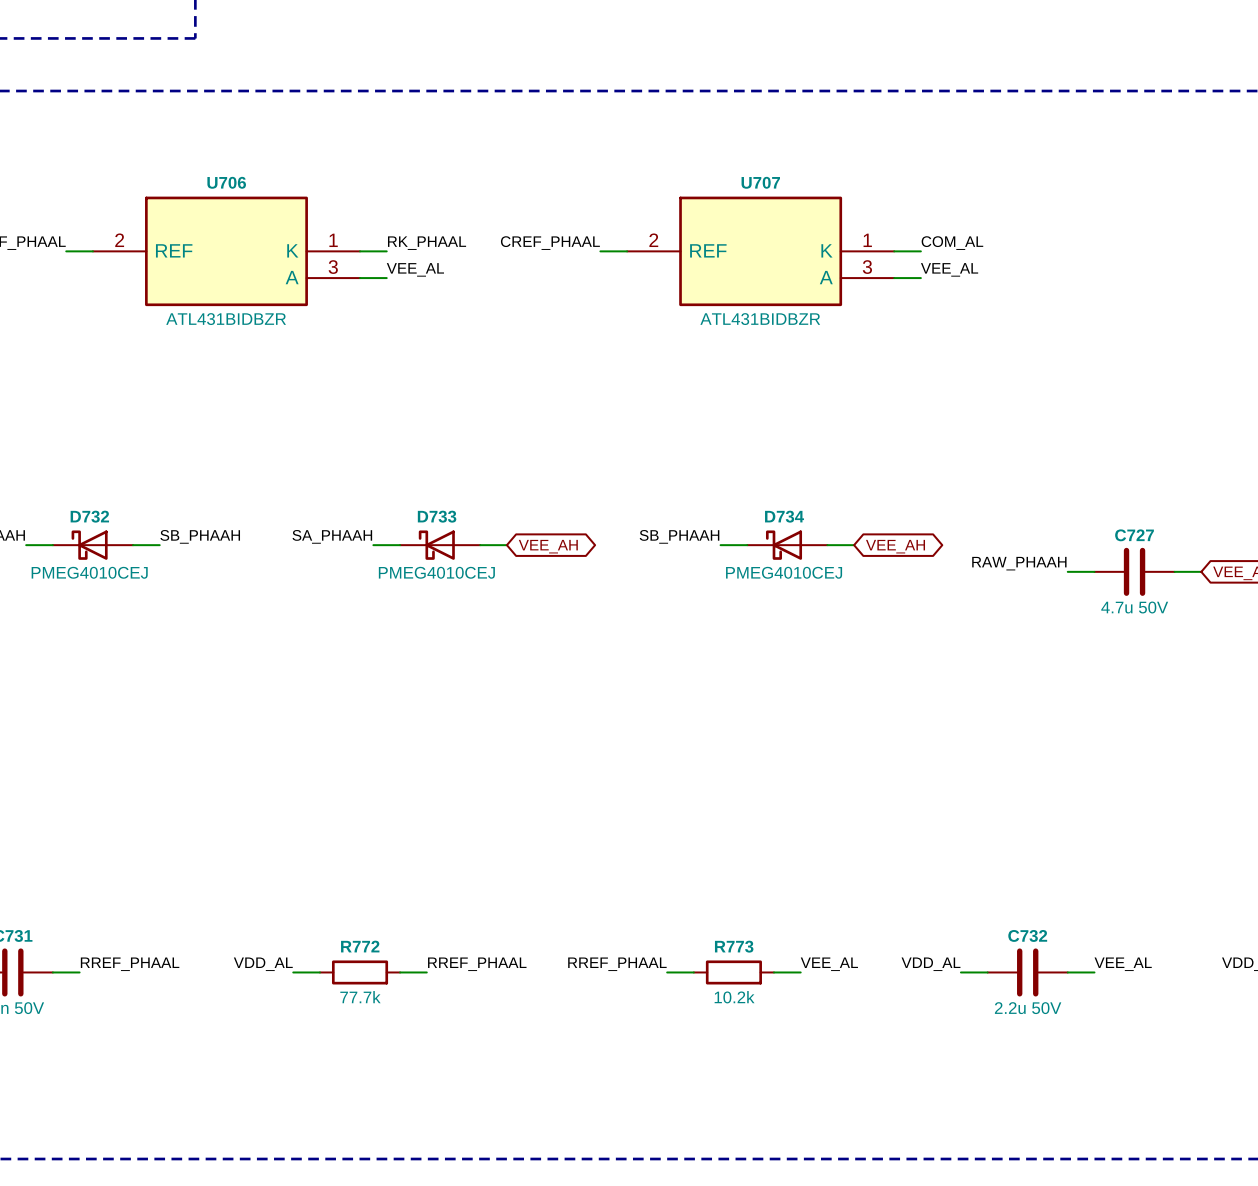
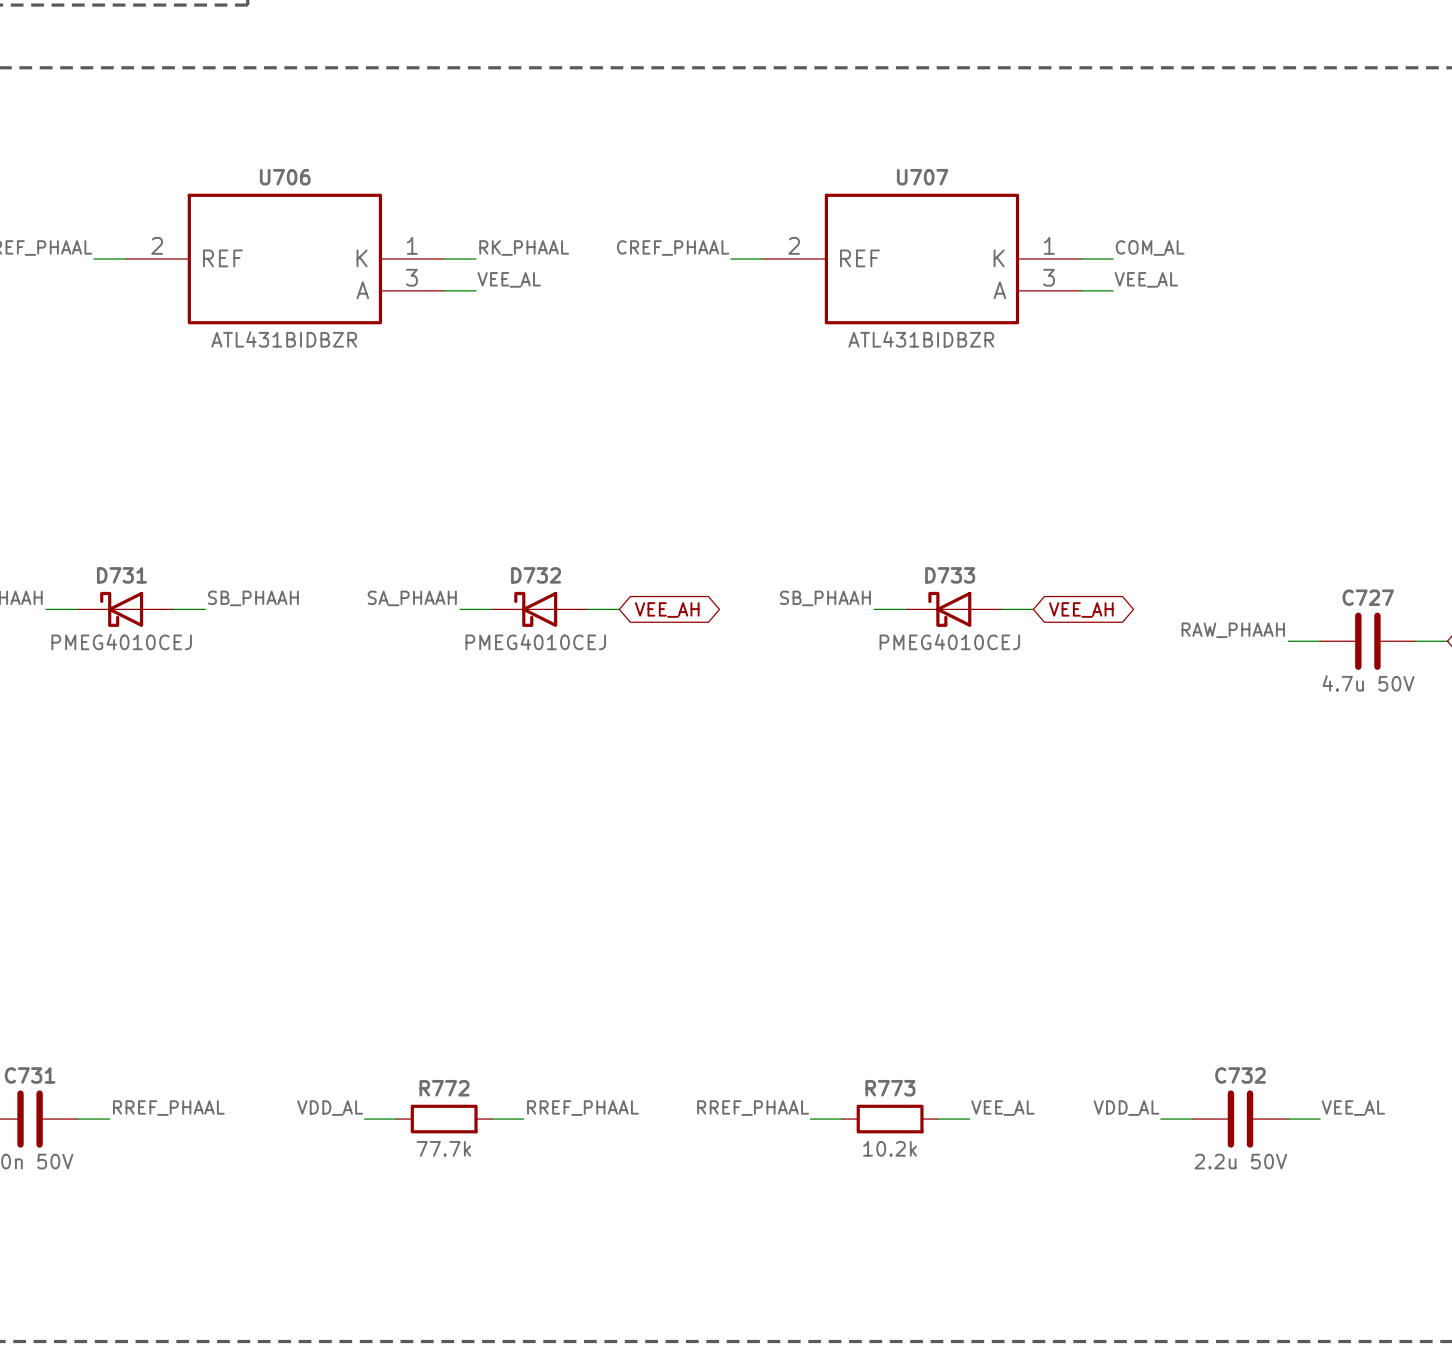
D732 name: D732 (89, 516) -> D731 (121, 575)
D733 name: D733 (437, 516) -> D732 (536, 575)
D734 name: D734 (784, 516) -> D733 (950, 575)

